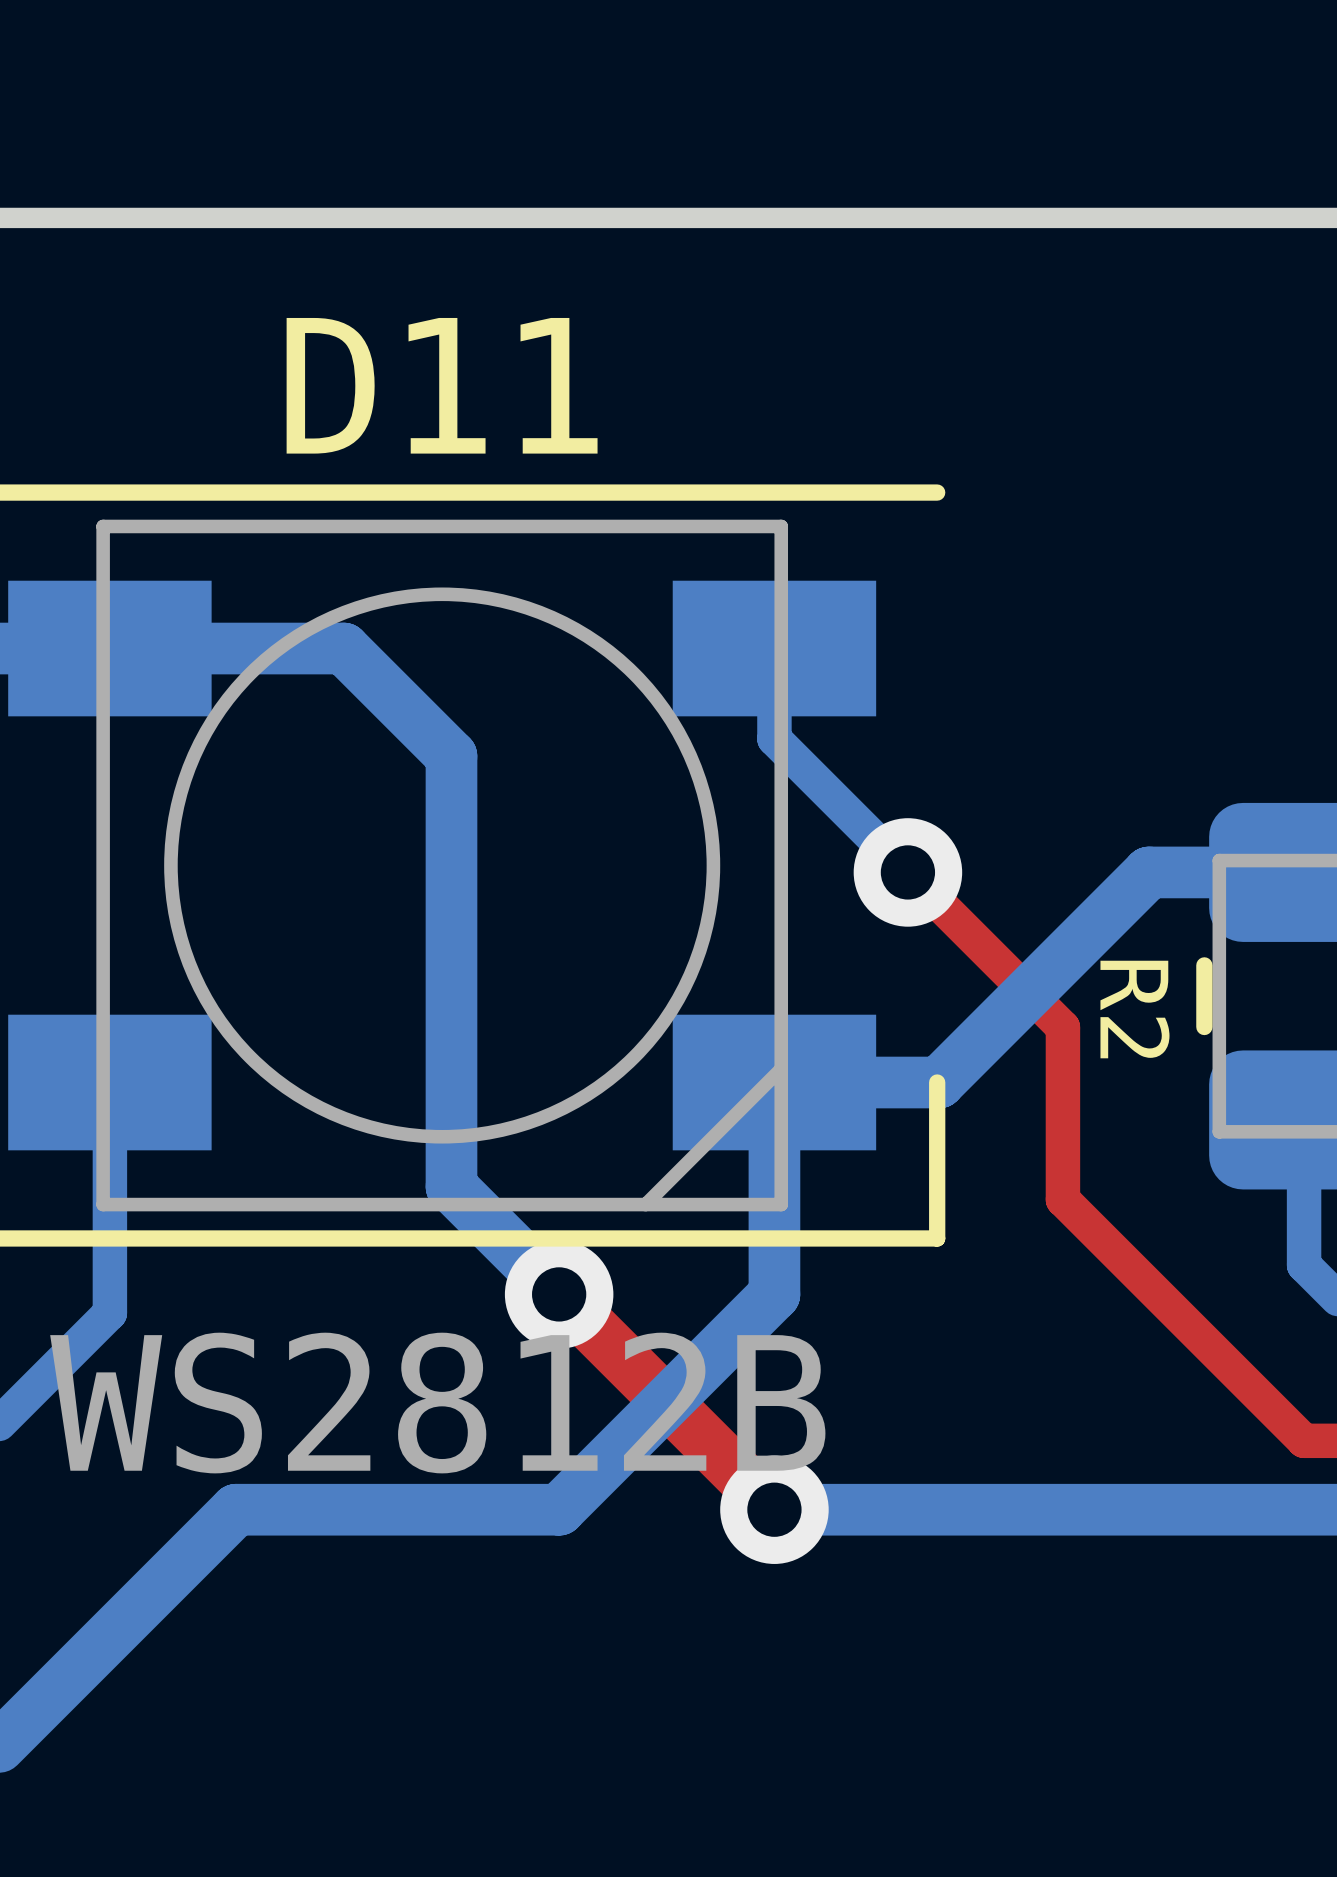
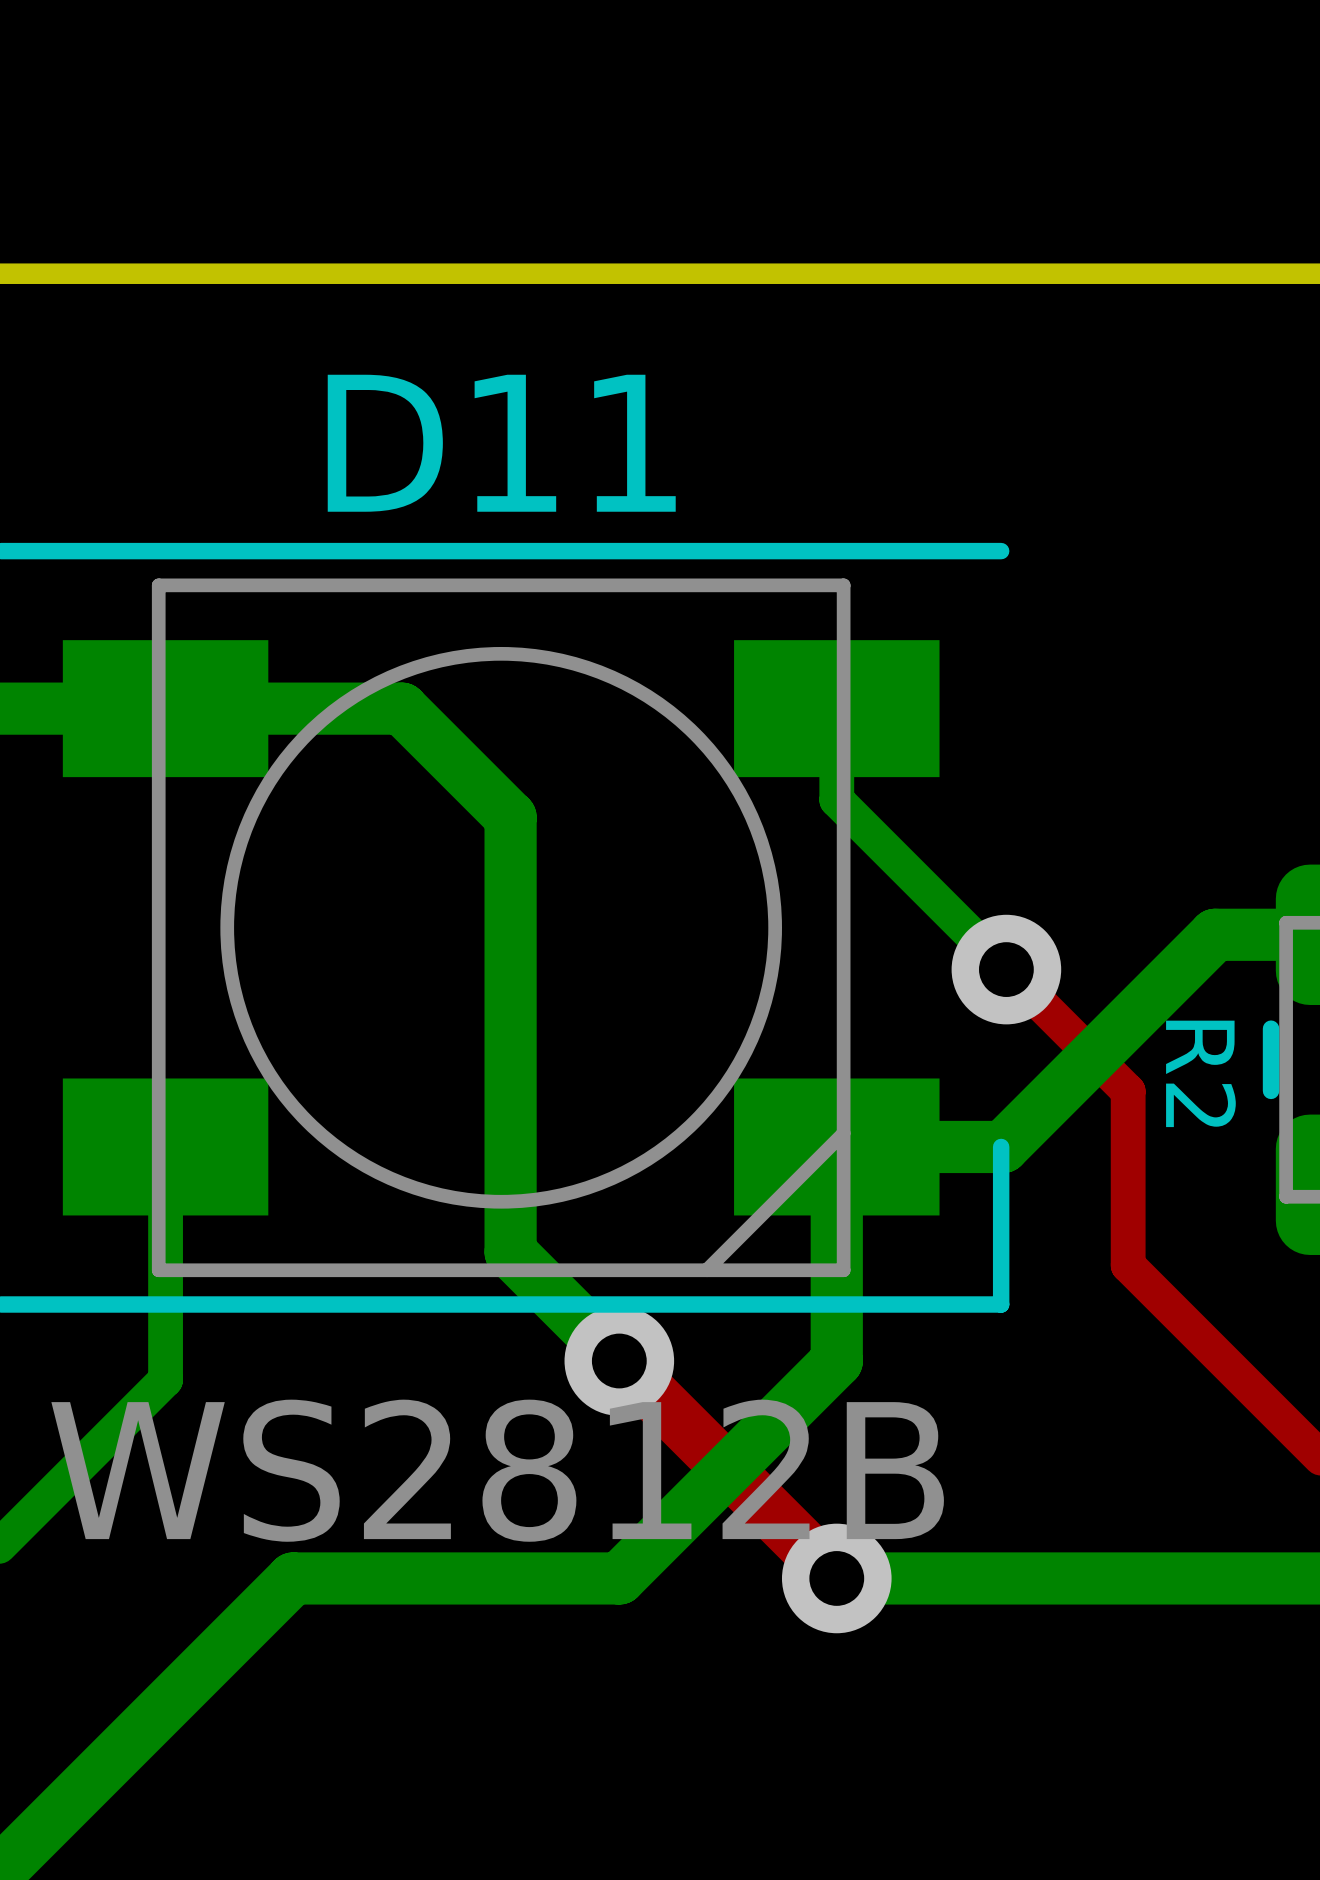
via position: (907, 872) -> (1006, 969)

